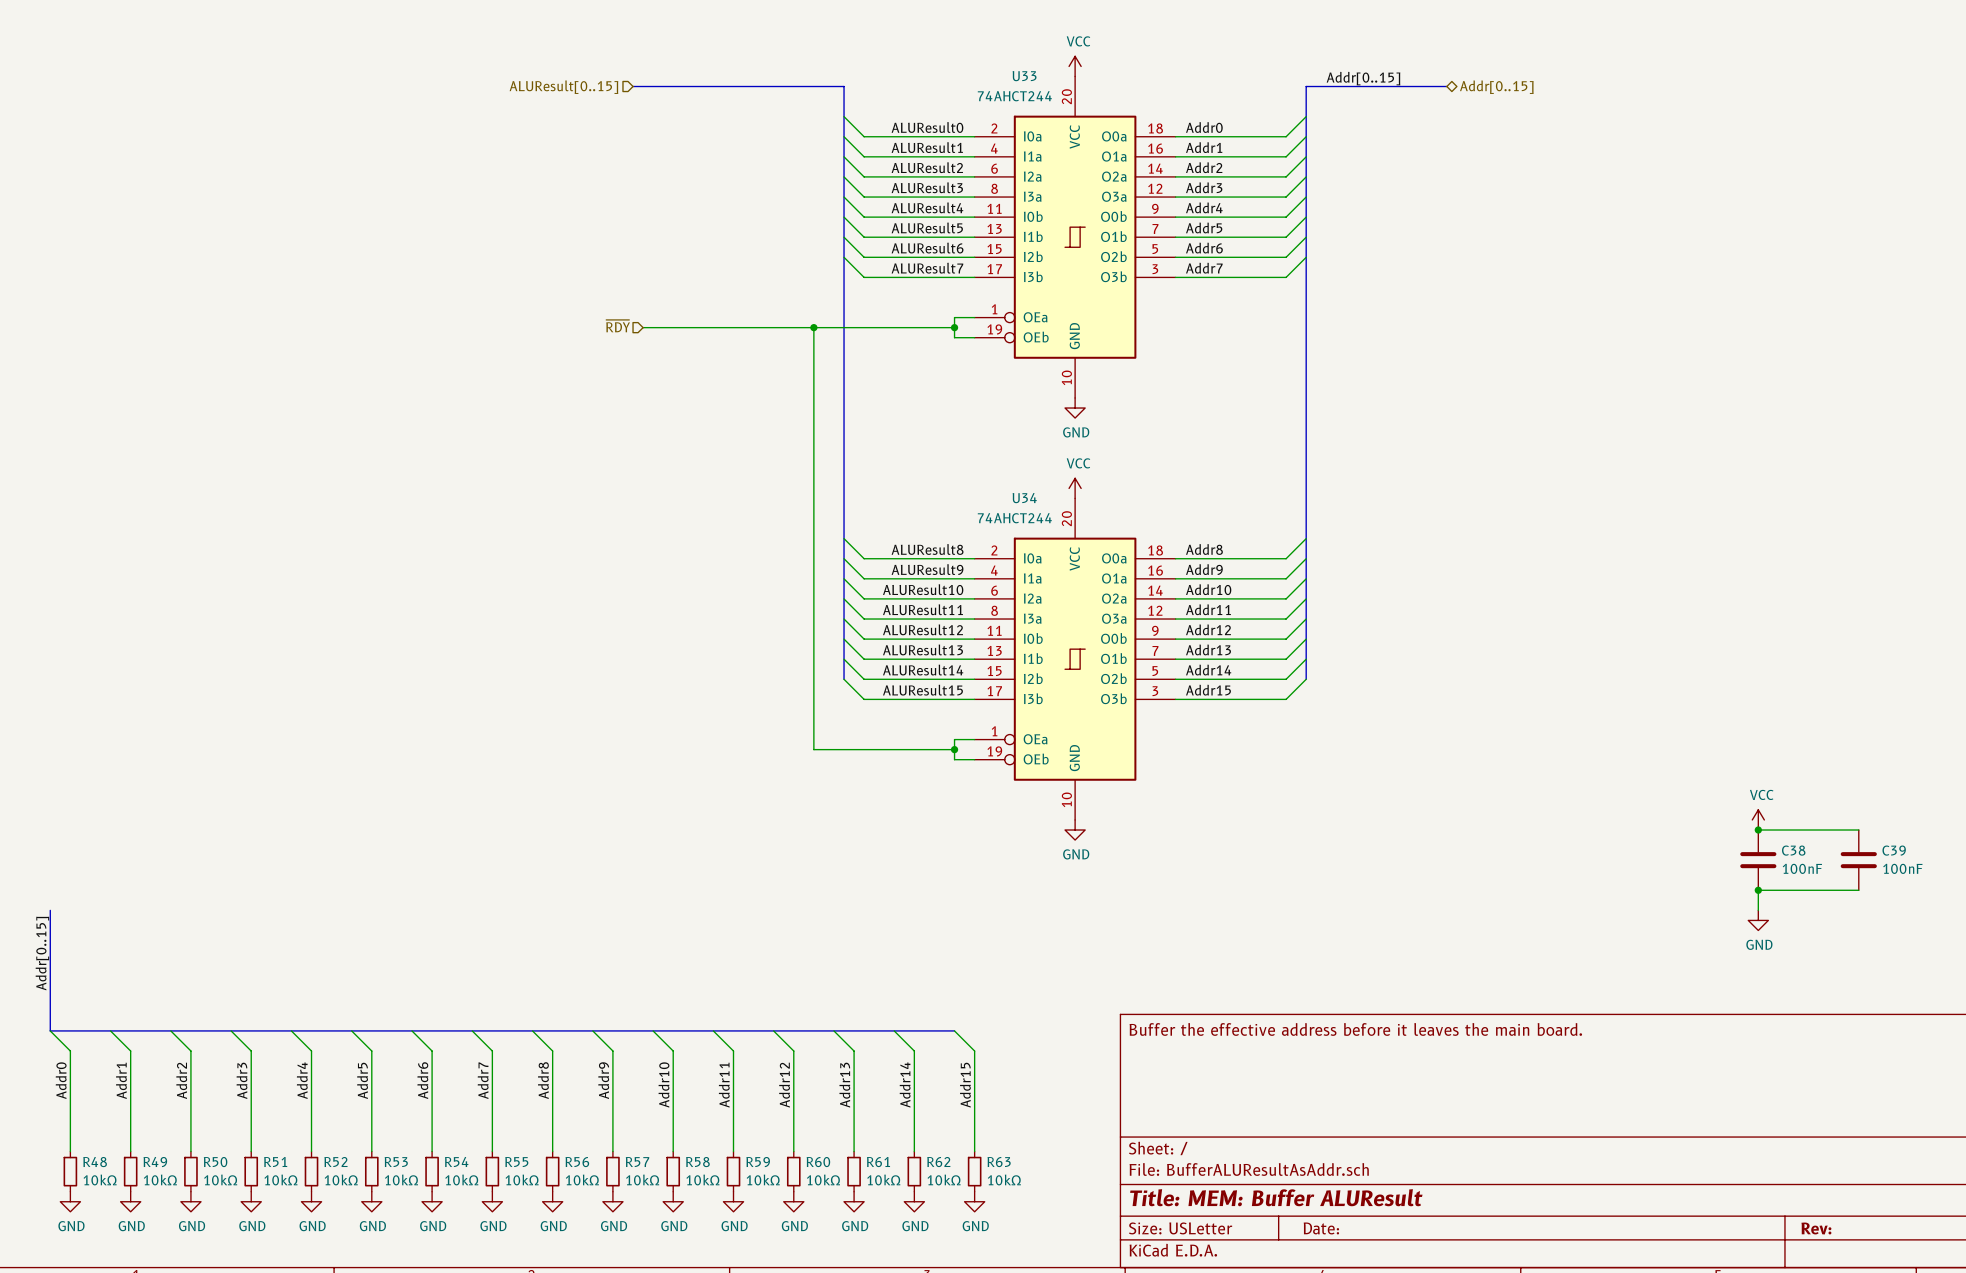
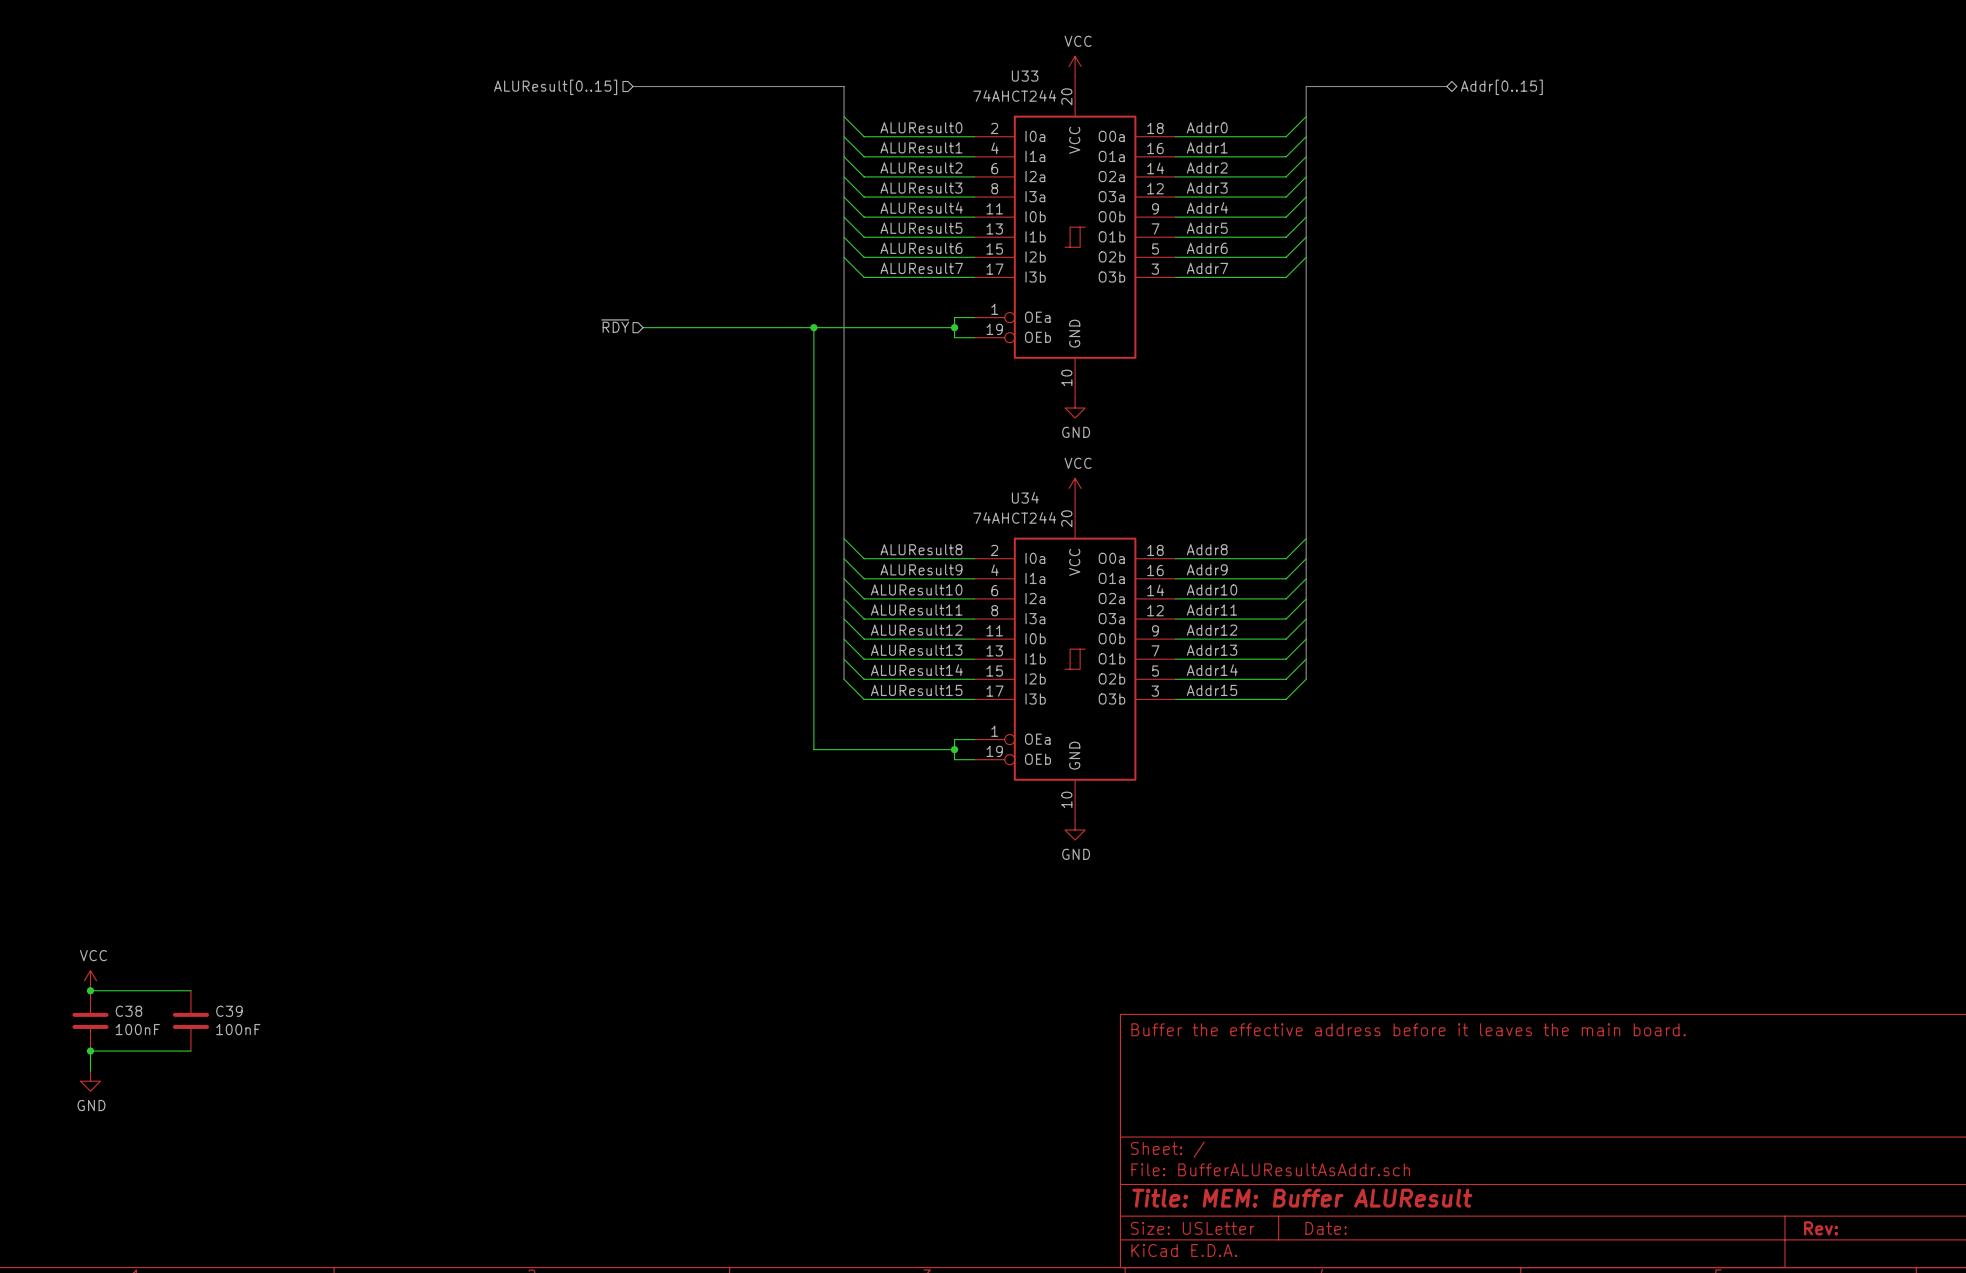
label: Addr[0..15] (1363, 78) -> none
power symbol: VCC (1758, 819) -> none
wire: (1758, 830) (1858, 830) -> none
junction: (1758, 830) -> none
C38 position: (1758, 860) -> (90, 1020)
C39 position: (1858, 860) -> (190, 1020)
junction: (1758, 890) -> none
wire: (1858, 890) (1758, 890) (1758, 910) -> none
bus: (50, 910) (50, 1030) (954, 1030) -> none
power symbol: GND (1758, 920) -> none
label: Addr[0..15] (42, 953) -> none
power symbol: none -> VCC (90, 980)
wire: none -> (90, 990) (190, 990)
junction: none -> (90, 990)
wire: (50, 1030) (70, 1051) (70, 1151) -> none
wire: (110, 1030) (130, 1051) (130, 1151) -> none
wire: (170, 1030) (190, 1051) (190, 1151) -> none
wire: (231, 1030) (251, 1051) (251, 1151) -> none
wire: (291, 1030) (311, 1051) (311, 1151) -> none
wire: (351, 1030) (371, 1051) (371, 1151) -> none
wire: (411, 1030) (432, 1051) (432, 1151) -> none
wire: (472, 1030) (492, 1051) (492, 1151) -> none
wire: (532, 1030) (552, 1051) (552, 1151) -> none
wire: (592, 1030) (612, 1051) (612, 1151) -> none
wire: (653, 1030) (673, 1051) (673, 1151) -> none
wire: (713, 1030) (733, 1051) (733, 1151) -> none
wire: (773, 1030) (793, 1051) (793, 1151) -> none
wire: (833, 1030) (854, 1051) (854, 1151) -> none
wire: (894, 1030) (914, 1051) (914, 1151) -> none
wire: (954, 1030) (974, 1051) (974, 1151) -> none
junction: none -> (90, 1051)
wire: none -> (190, 1051) (90, 1051) (90, 1071)
label: Addr0 (61, 1080) -> none
label: Addr1 (121, 1080) -> none
label: Addr2 (181, 1080) -> none
label: Addr3 (241, 1080) -> none
label: Addr4 (302, 1080) -> none
label: Addr5 (362, 1080) -> none
label: Addr6 (422, 1080) -> none
label: Addr7 (483, 1080) -> none
label: Addr8 (543, 1080) -> none
label: Addr9 (603, 1080) -> none
power symbol: none -> GND (90, 1081)
label: Addr10 (663, 1084) -> none
label: Addr11 (724, 1085) -> none
label: Addr12 (784, 1085) -> none
label: Addr13 (844, 1085) -> none
label: Addr14 (905, 1085) -> none
label: Addr15 (965, 1085) -> none
R48: 10kΩ (70, 1171) -> none
R49: 10kΩ (130, 1171) -> none
R50: 10kΩ (190, 1171) -> none
R51: 10kΩ (251, 1171) -> none
R52: 10kΩ (311, 1171) -> none
R53: 10kΩ (371, 1171) -> none
R54: 10kΩ (432, 1171) -> none
R55: 10kΩ (492, 1171) -> none
R56: 10kΩ (552, 1171) -> none
R57: 10kΩ (612, 1171) -> none
R58: 10kΩ (673, 1171) -> none
R59: 10kΩ (733, 1171) -> none
R60: 10kΩ (793, 1171) -> none
R61: 10kΩ (854, 1171) -> none
R62: 10kΩ (914, 1171) -> none
R63: 10kΩ (974, 1171) -> none
power symbol: GND (70, 1201) -> none
power symbol: GND (130, 1201) -> none
power symbol: GND (190, 1201) -> none
power symbol: GND (251, 1201) -> none
power symbol: GND (311, 1201) -> none
power symbol: GND (371, 1201) -> none
power symbol: GND (432, 1201) -> none
power symbol: GND (492, 1201) -> none
power symbol: GND (552, 1201) -> none
power symbol: GND (612, 1201) -> none
power symbol: GND (673, 1201) -> none
power symbol: GND (733, 1201) -> none
power symbol: GND (793, 1201) -> none
power symbol: GND (854, 1201) -> none
power symbol: GND (914, 1201) -> none
power symbol: GND (974, 1201) -> none

